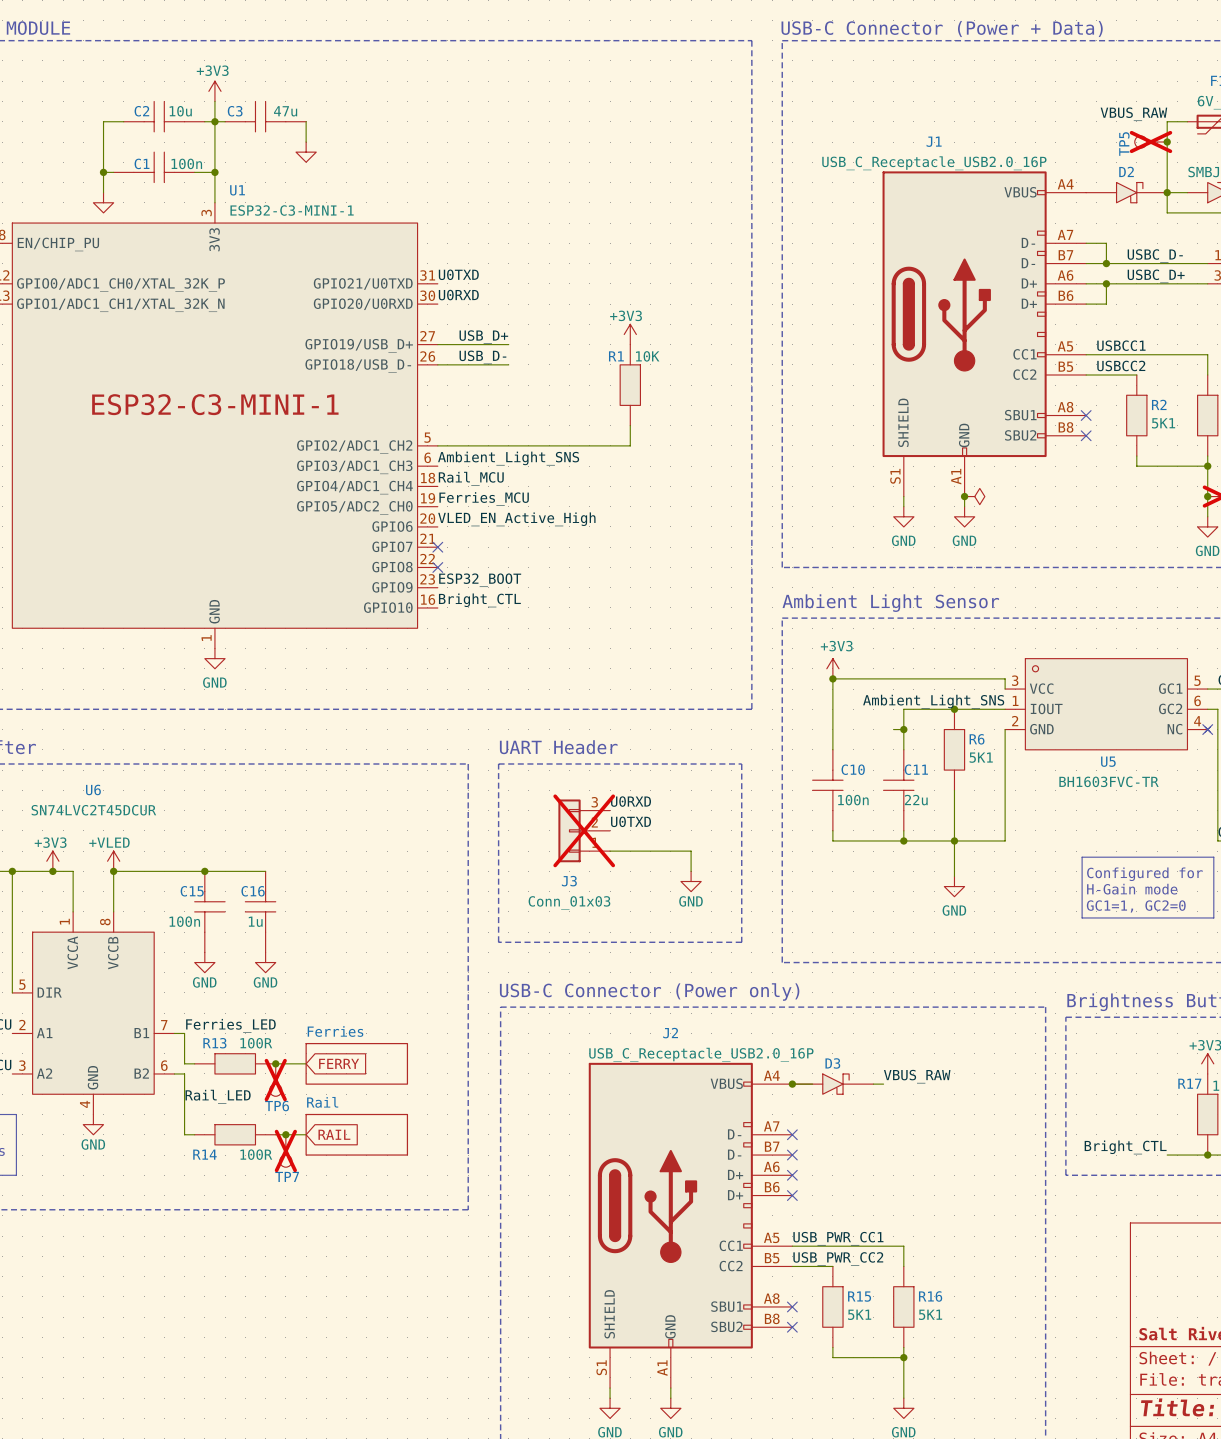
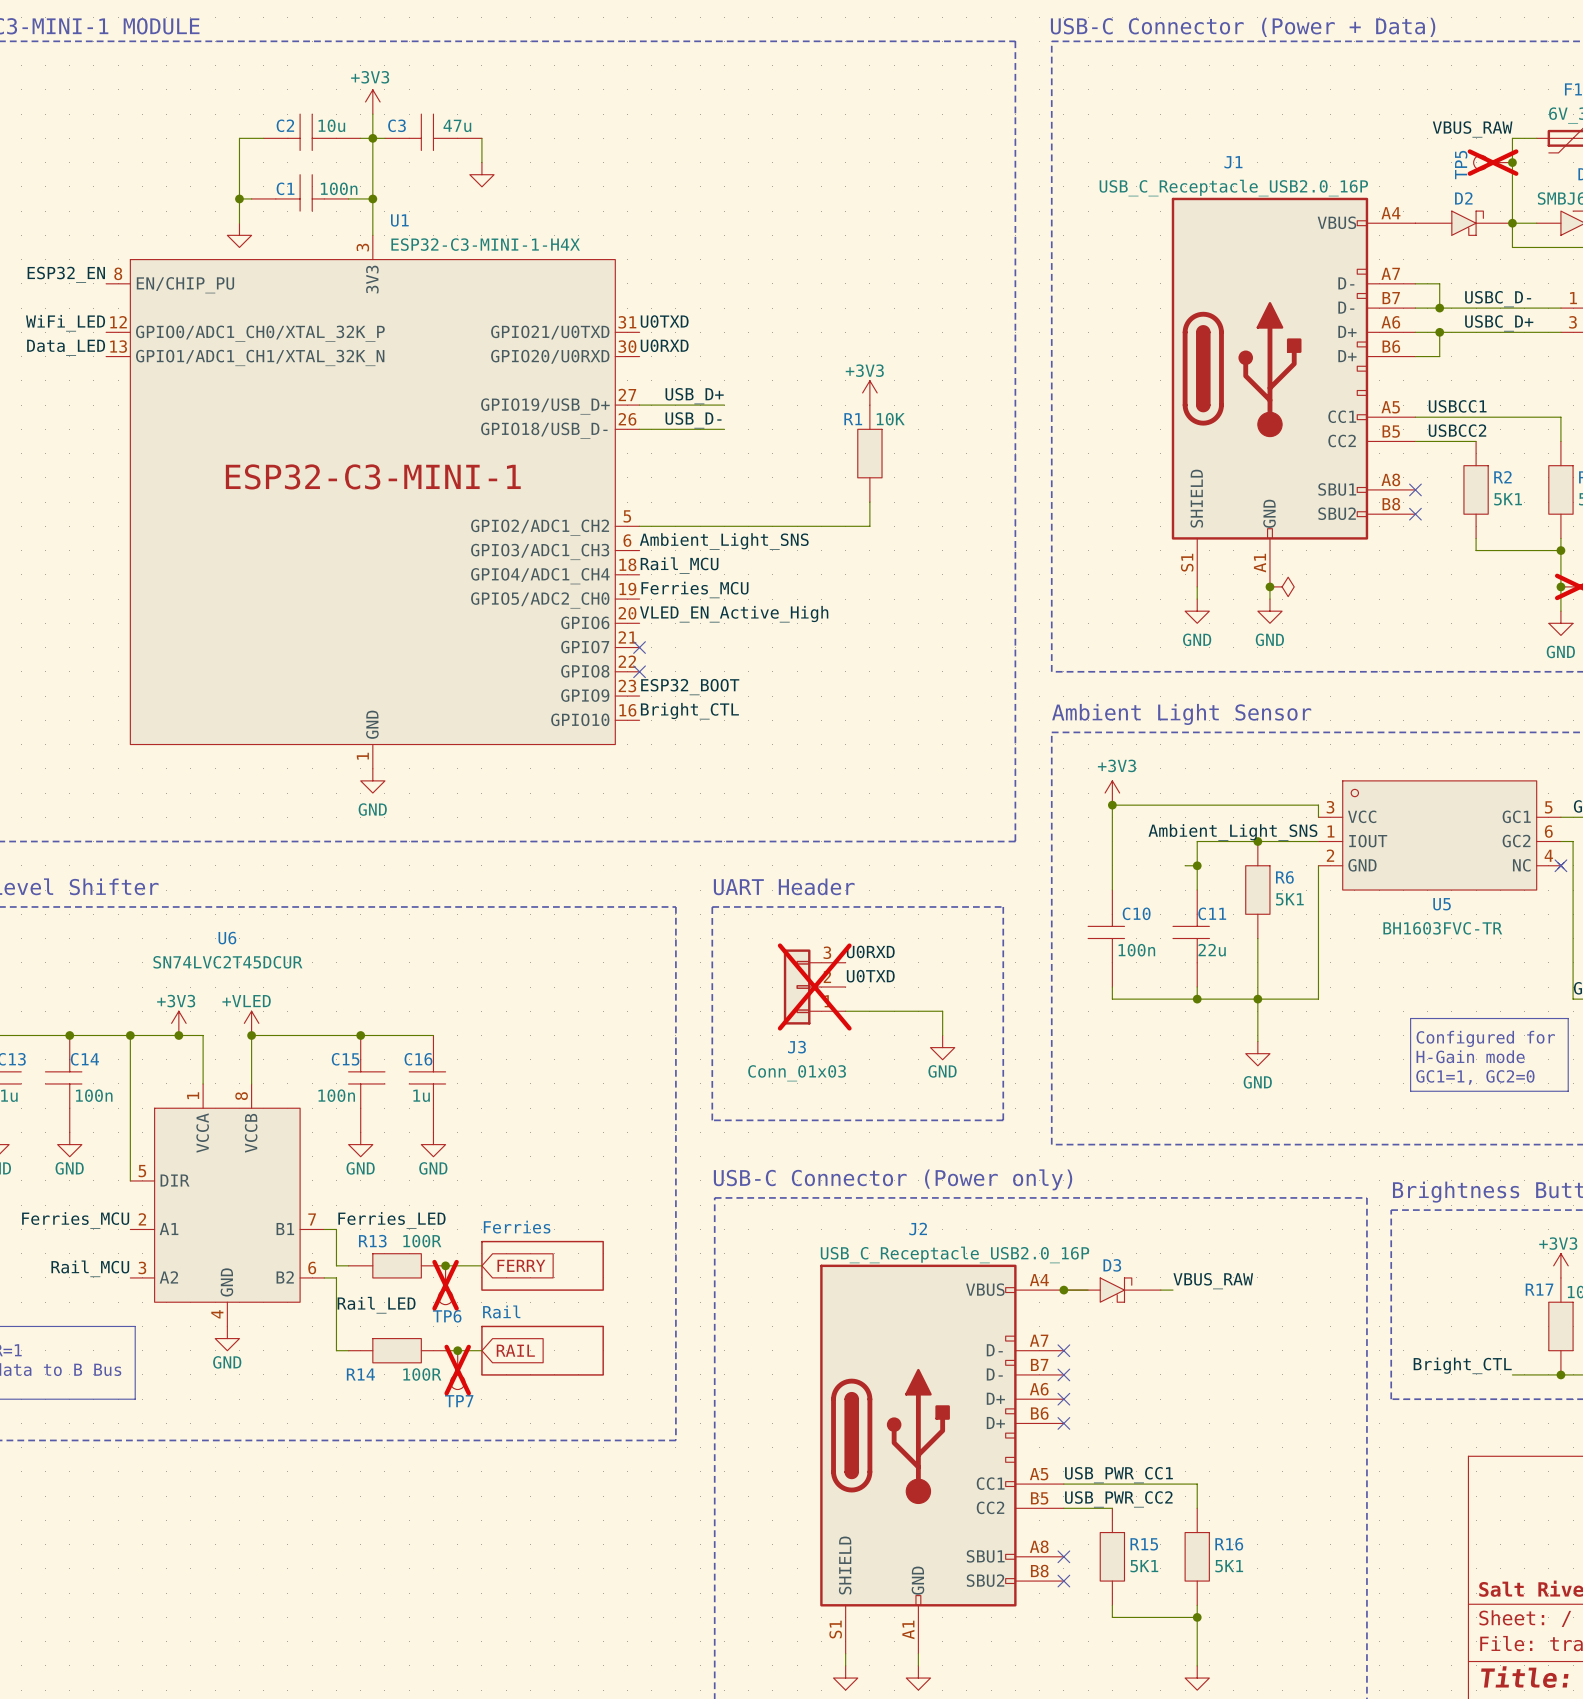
U1 value: ESP32-C3-MINI-1 (292, 210) -> ESP32-C3-MINI-1-H4X (485, 244)

